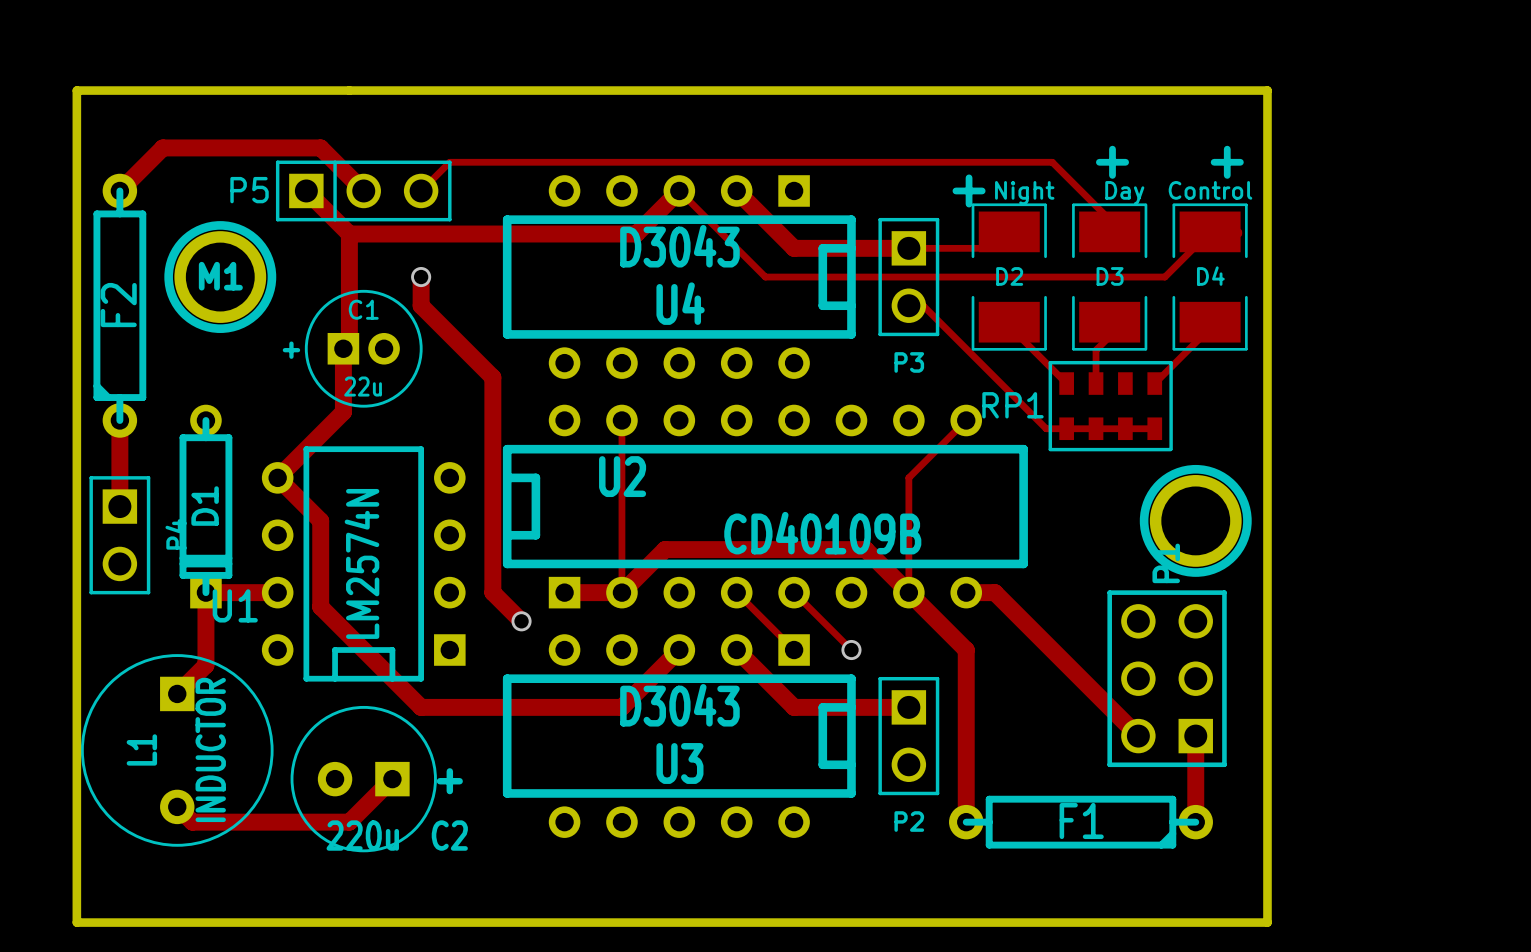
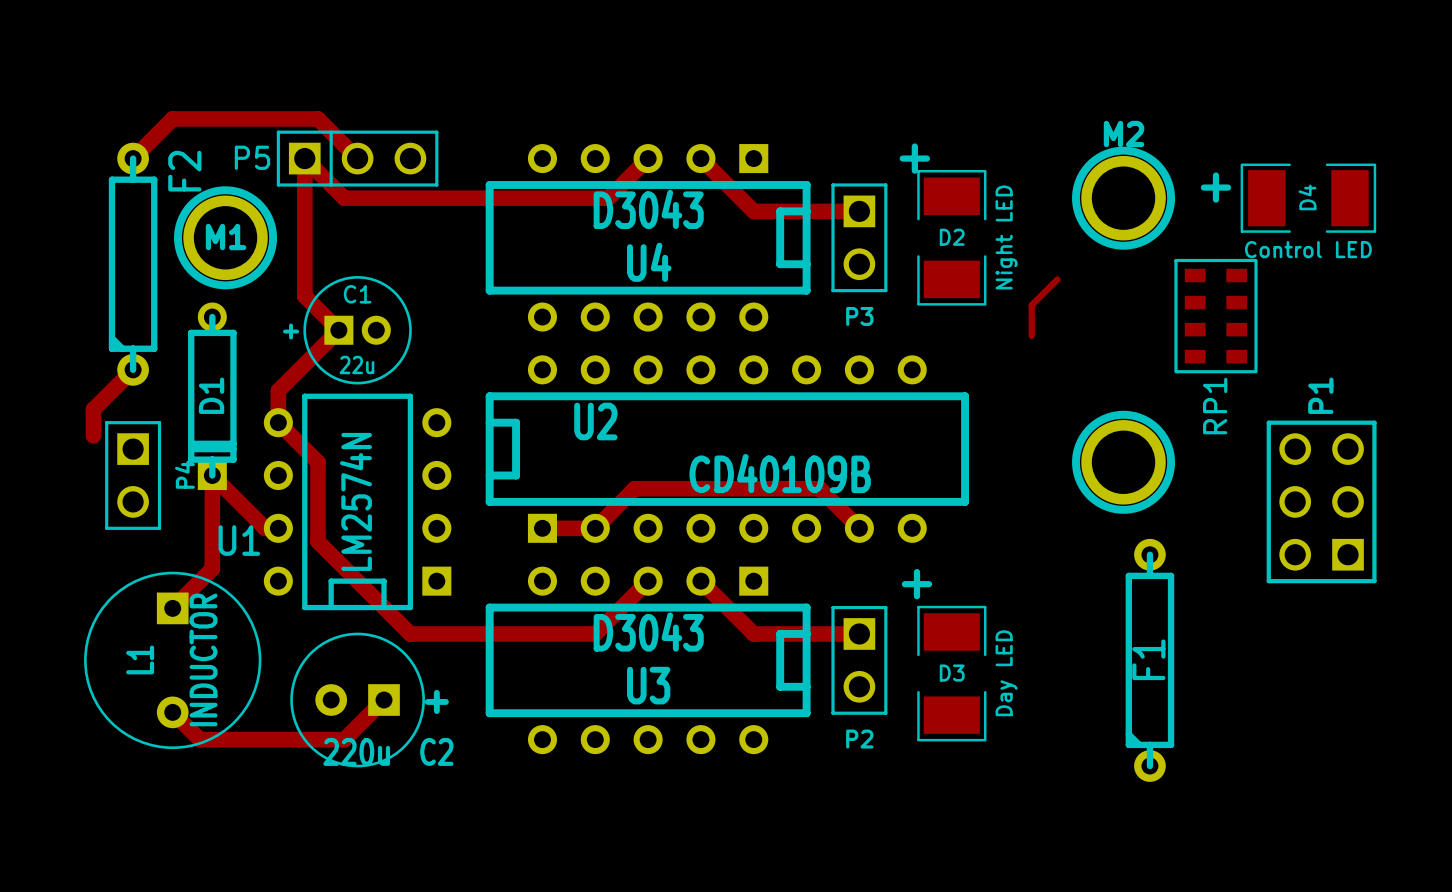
board edge: (76, 90) (1267, 90) (1267, 922) (76, 922) (76, 90) -> none
D3 text position: + (1112, 162) -> + (916, 584)
track: (421, 190) (449, 162) (1052, 162) (1124, 231) -> none
track: (679, 190) (765, 277) (1164, 277) (1210, 231) -> none
D4 value: Control (1210, 190) -> Control LED (1308, 249)
D2 value: Night (1024, 193) -> Night LED (1006, 237)
D3 value: Day (1124, 193) -> Day LED (1006, 673)
D4 footprint: [1172, 203, 1248, 351] -> [1240, 163, 1377, 233]
track: (1009, 231) (992, 248) (908, 248) -> none
track: (349, 234) (349, 342) (343, 348) (343, 412) (277, 477) -> (304, 158) (304, 296) (338, 330) (278, 390) (278, 422)
M2: none -> (1123, 198)
track: (421, 277) (421, 305) (492, 377) (492, 592) (521, 621) -> none
via: (421, 277) -> none
D3 position: (1109, 277) -> (951, 673)
F2 name position: F2 (118, 305) -> F2 (184, 171)
track: (908, 305) (923, 305) (1046, 428) (1154, 428) -> none
track: (1009, 322) (1009, 326) (1066, 383) -> none
track: (1210, 322) (1210, 328) (1154, 383) -> none
C1 position: (363, 348) -> (357, 330)
RP1 rotation: 0° (1110, 406) -> 90° counterclockwise (1215, 316)
RP1 position: (1110, 406) -> (1215, 316)
track: (119, 420) (119, 506) -> (133, 369) (93, 409) (93, 435)
track: (621, 420) (621, 592) -> none
track: (966, 420) (908, 477) (908, 592) (966, 650) (966, 822) -> none
D1 position: (205, 506) -> (212, 396)
track: (205, 592) (263, 592) -> (212, 528) (212, 475) (265, 528)
track: (736, 592) (794, 650) -> none
track: (794, 592) (851, 650) -> none
track: (966, 592) (994, 592) (1138, 736) -> none
via: (521, 621) -> none
track: (205, 636) (205, 665) (177, 693) -> (212, 568) (172, 608)
via: (851, 650) -> none
P1 position: (1167, 678) -> (1321, 501)
track: (1195, 736) (1195, 822) -> none
L1 position: (177, 750) -> (172, 660)
F1 rotation: 0° (1081, 822) -> 90° clockwise (1149, 660)
F1 position: (1081, 822) -> (1149, 660)

